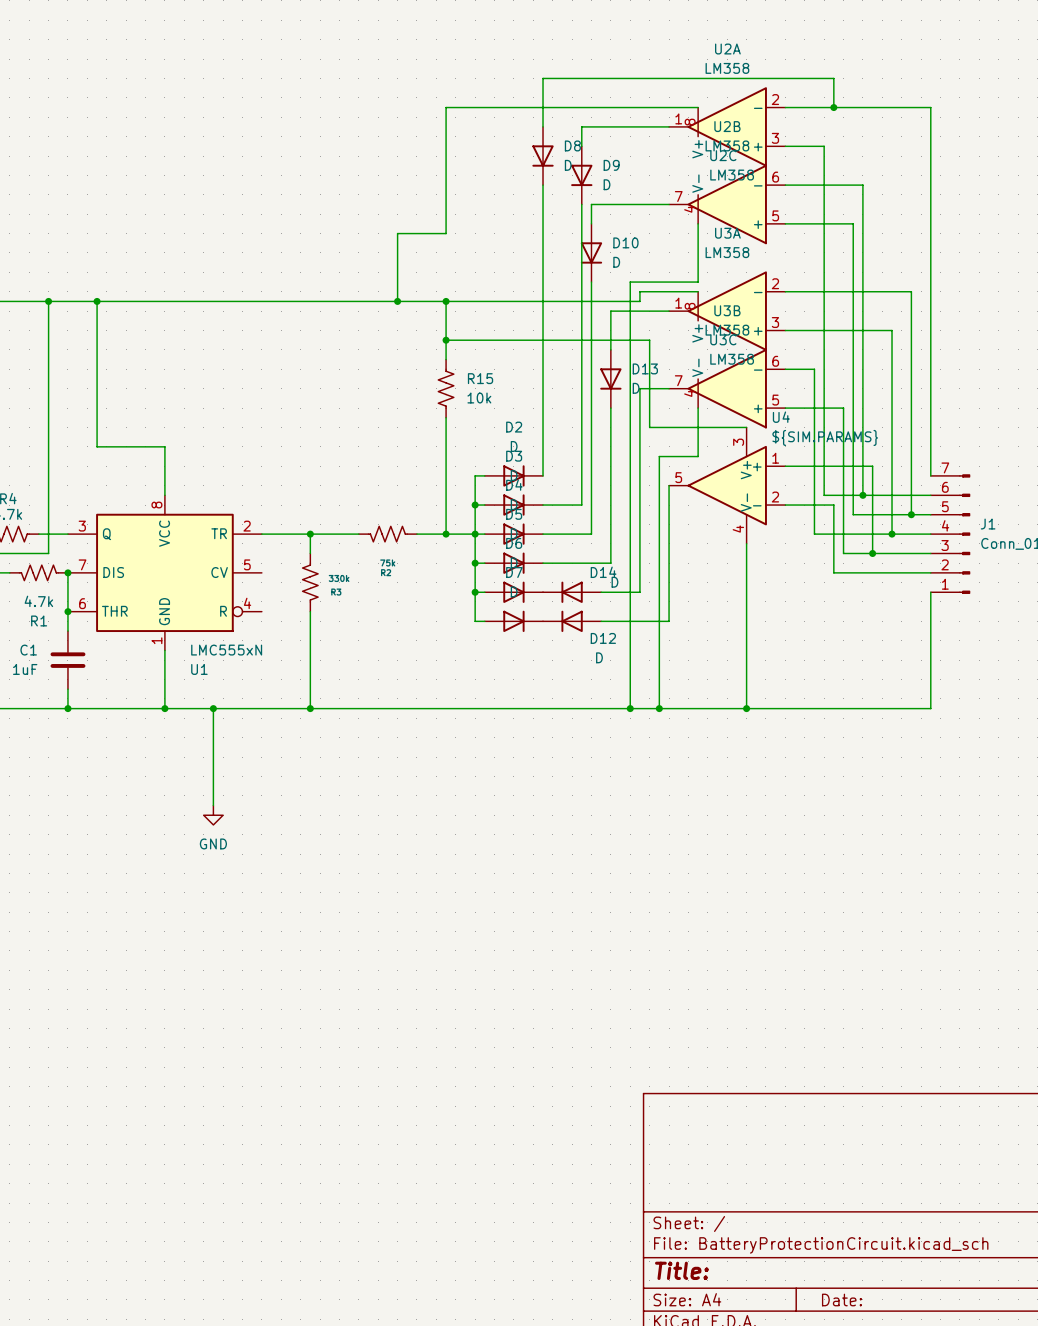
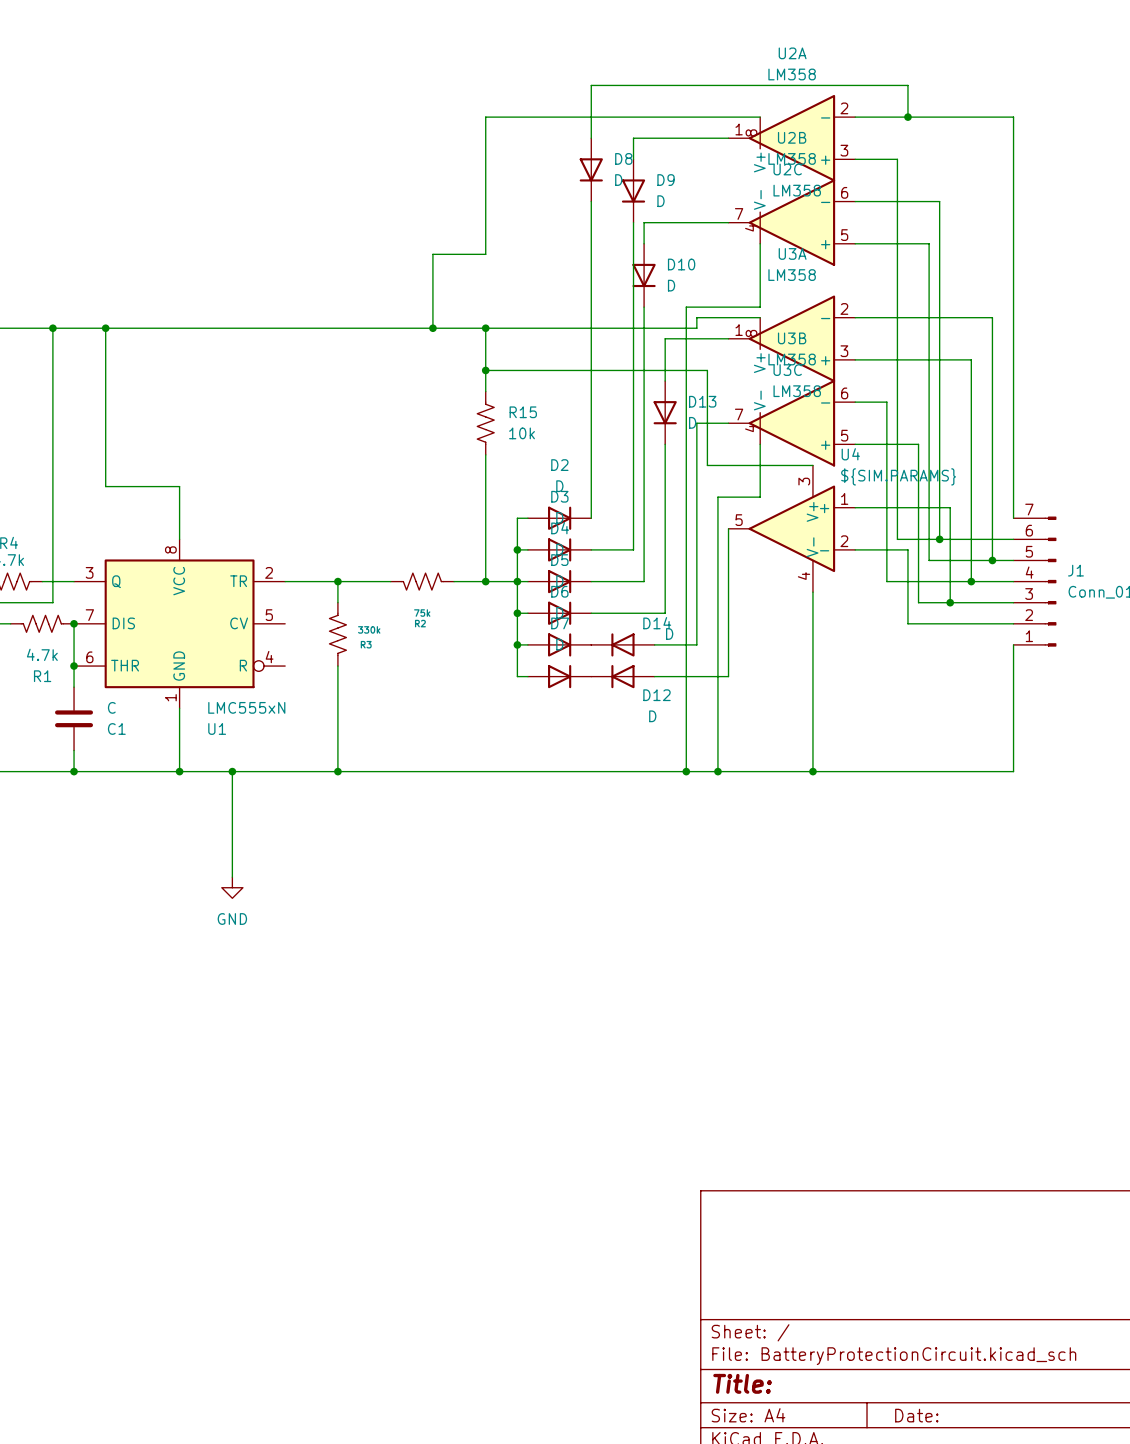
C1 name position: C1 (28, 650) -> C1 (116, 728)
C1 value: 1uF (25, 669) -> C (111, 707)

